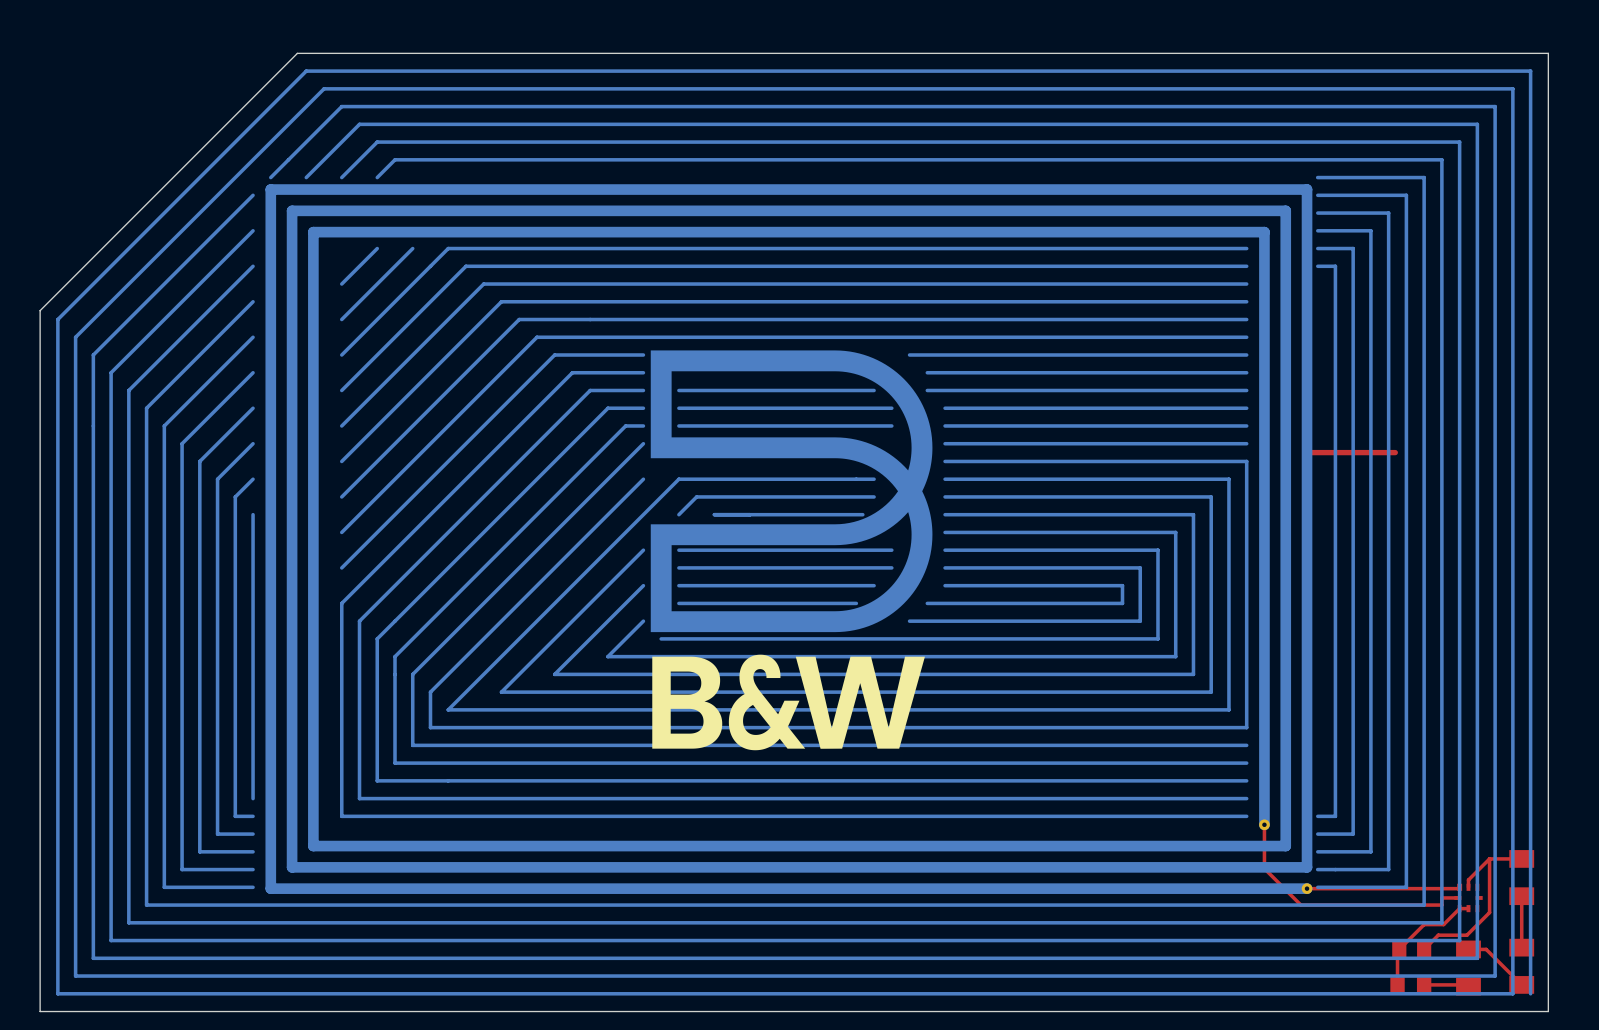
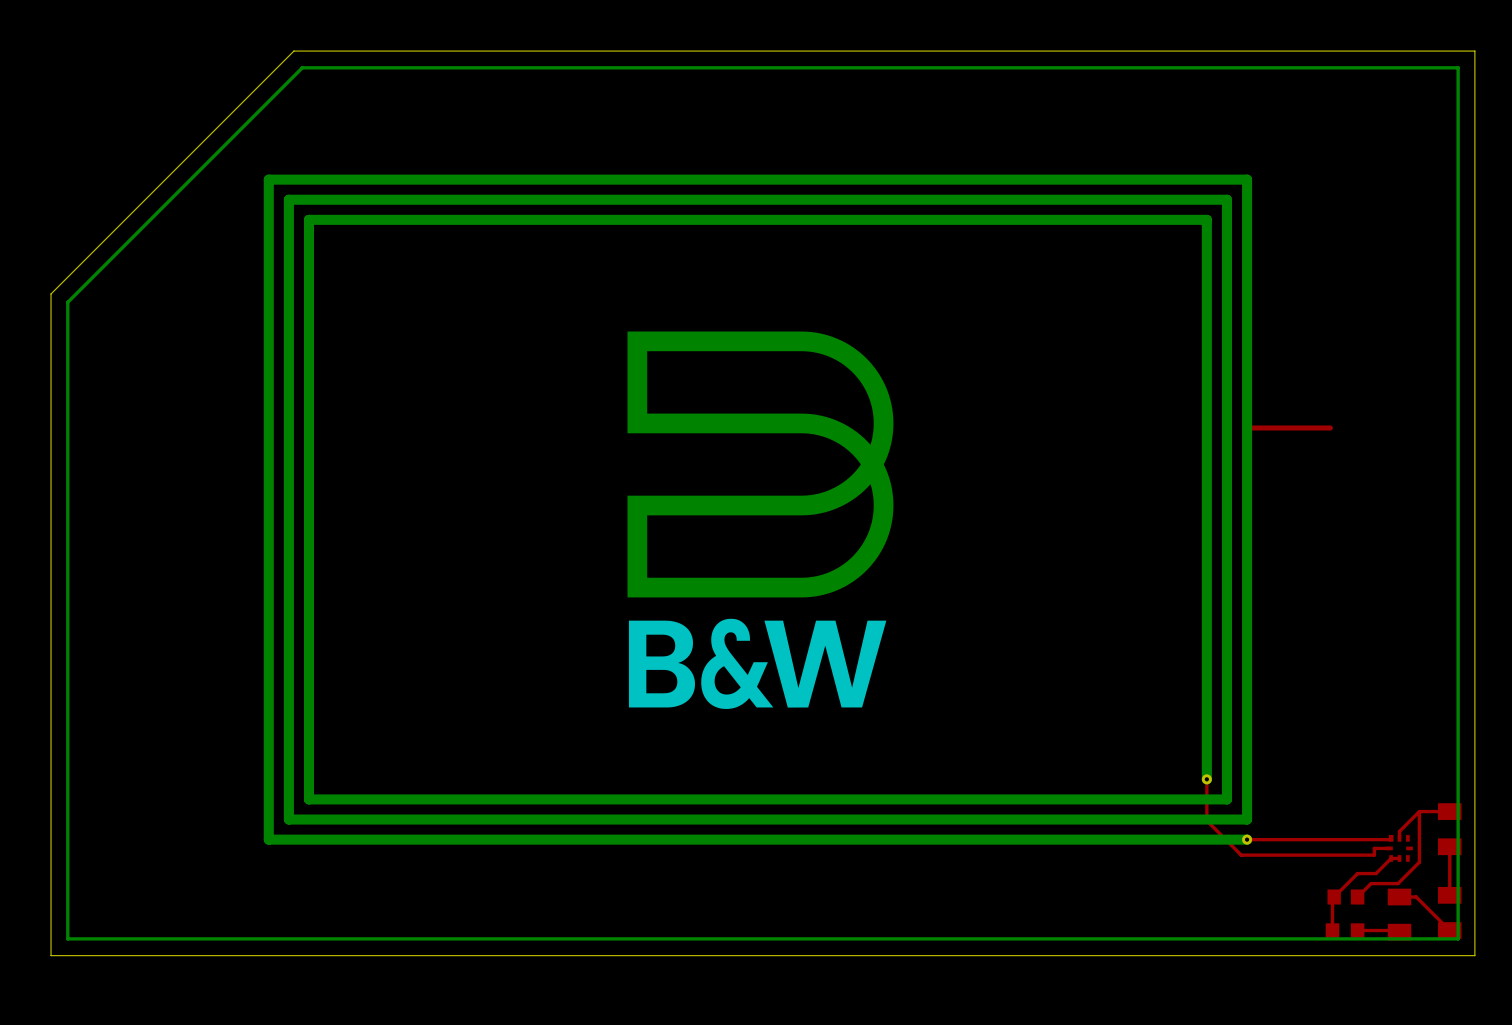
bottom track: (270, 177) (341, 106) (1495, 106) (1495, 976) (75, 976) (75, 337) (324, 88) (1512, 88) (1512, 993) -> (1458, 938) (1441, 938)
bottom track: (306, 177) (359, 124) (1477, 124) (1477, 958) (93, 958) (93, 355) (253, 195) -> none
bottom track: (341, 177) (377, 142) (1459, 142) (1459, 940) (111, 940) (111, 372) (253, 230) -> none
bottom track: (377, 177) (395, 159) (1441, 159) (1441, 922) (128, 922) (128, 390) (253, 266) -> none
bottom track: (1317, 177) (1424, 177) (1424, 905) (146, 905) (146, 408) (253, 301) -> none
bottom track: (1317, 195) (1406, 195) (1406, 887) (1317, 887) -> none
bottom track: (1317, 213) (1388, 213) (1388, 869) (1317, 869) -> none
bottom track: (1317, 230) (1370, 230) (1370, 851) (1317, 851) -> none
bottom track: (377, 248) (341, 284) -> none
bottom track: (412, 248) (341, 319) -> none
bottom track: (1246, 248) (448, 248) (341, 355) -> none
bottom track: (1317, 248) (1353, 248) (1353, 834) (1317, 834) -> none
bottom track: (1246, 266) (465, 266) (341, 390) -> none
bottom track: (1317, 266) (1335, 266) (1335, 816) (1317, 816) -> none
bottom track: (1246, 284) (483, 284) (341, 425) -> none
bottom track: (1246, 301) (501, 301) (341, 461) -> none
bottom track: (1246, 319) (519, 319) (341, 496) -> none
bottom track: (253, 337) (164, 425) (164, 887) (253, 887) -> none
bottom track: (1246, 337) (536, 337) (341, 532) -> none
bottom track: (643, 355) (554, 355) (341, 567) -> none
bottom track: (1246, 355) (909, 355) -> none
bottom track: (253, 372) (182, 443) (182, 869) (253, 869) -> none
bottom track: (643, 372) (572, 372) (341, 603) (341, 816) (1246, 816) -> none
bottom track: (1246, 372) (927, 372) -> none
bottom track: (643, 390) (590, 390) (359, 621) (359, 798) (1246, 798) -> none
bottom track: (874, 390) (678, 390) -> none
bottom track: (1246, 390) (927, 390) -> none
bottom track: (253, 408) (199, 461) (199, 851) (253, 851) -> none
bottom track: (643, 408) (607, 408) (377, 638) (377, 780) (1246, 780) -> none
bottom track: (891, 408) (678, 408) -> none
bottom track: (1246, 408) (945, 408) -> none
bottom track: (643, 425) (625, 425) (395, 656) (395, 763) (1246, 763) -> none
bottom track: (891, 425) (678, 425) -> none
bottom track: (1246, 425) (945, 425) -> none
bottom track: (253, 443) (217, 479) (217, 834) (253, 834) -> none
bottom track: (643, 443) (412, 674) (412, 745) (1246, 745) -> none
bottom track: (1246, 443) (945, 443) -> none
bottom track: (945, 461) (1246, 461) (1246, 727) (430, 727) (430, 692) (643, 479) -> none
bottom track: (253, 479) (235, 496) (235, 816) (253, 816) -> none
bottom track: (945, 479) (1228, 479) (1228, 709) (448, 709) (678, 479) (874, 479) -> none
bottom track: (874, 496) (696, 496) (678, 514) -> none
bottom track: (945, 496) (1211, 496) (1211, 692) (501, 692) (643, 550) -> none
bottom track: (253, 514) (253, 798) -> none
bottom track: (862, 514) (714, 514) -> none
bottom track: (945, 514) (1193, 514) (1193, 674) (554, 674) (643, 585) -> none
bottom track: (945, 532) (1175, 532) (1175, 656) (607, 656) (643, 621) -> none
bottom track: (891, 550) (678, 550) -> none
bottom track: (945, 550) (1157, 550) (1157, 638) (661, 638) -> none
bottom track: (891, 567) (678, 567) -> none
bottom track: (945, 567) (1140, 567) (1140, 621) (909, 621) -> none
bottom track: (874, 585) (678, 585) -> none
bottom track: (945, 585) (1122, 585) (1122, 603) (927, 603) -> none
bottom track: (856, 603) (678, 603) -> none

